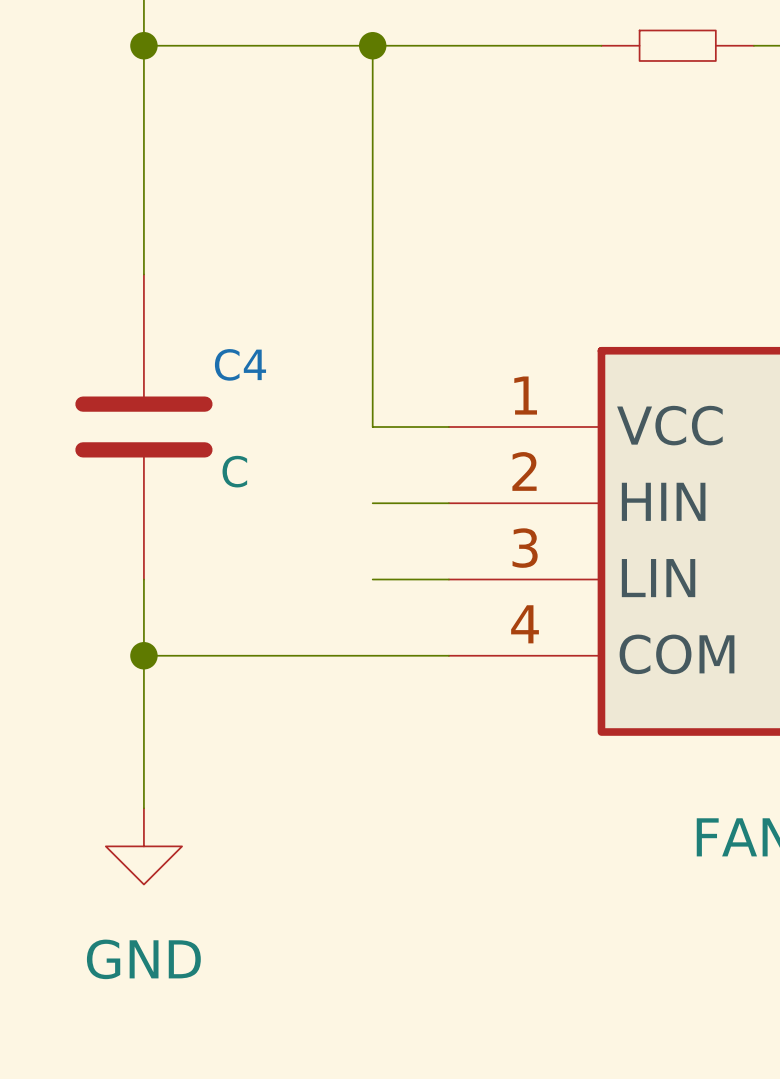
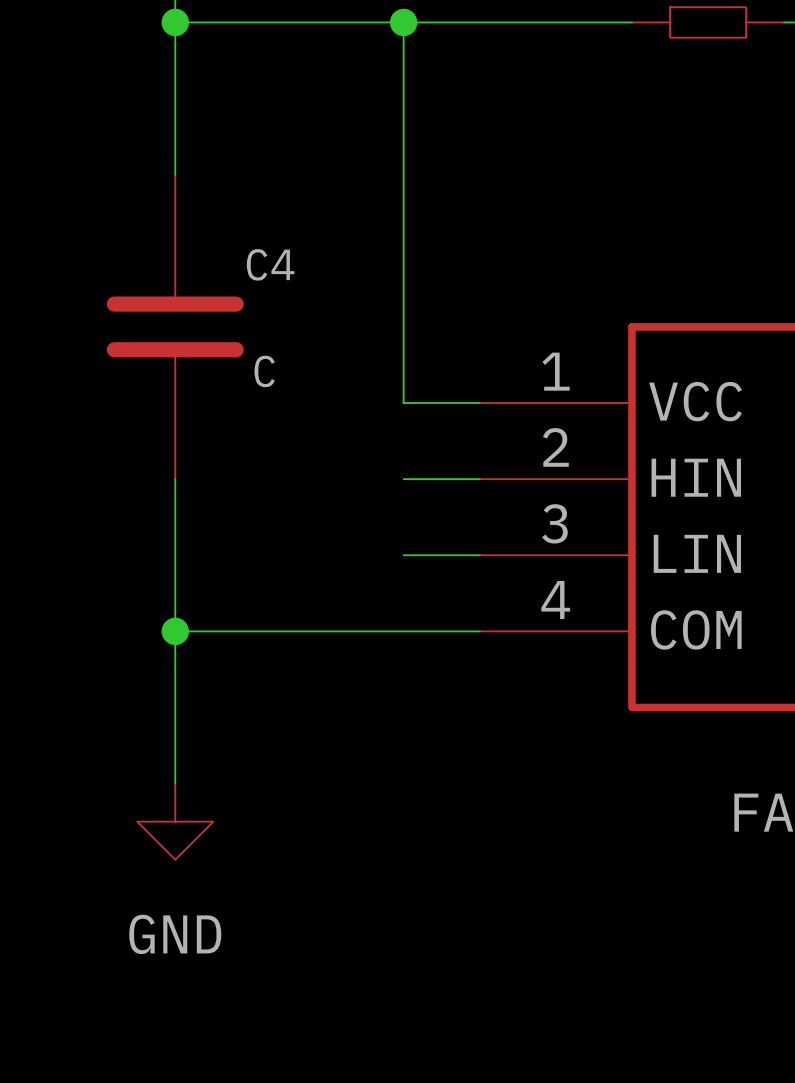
C4 position: (143, 427) -> (175, 326)

